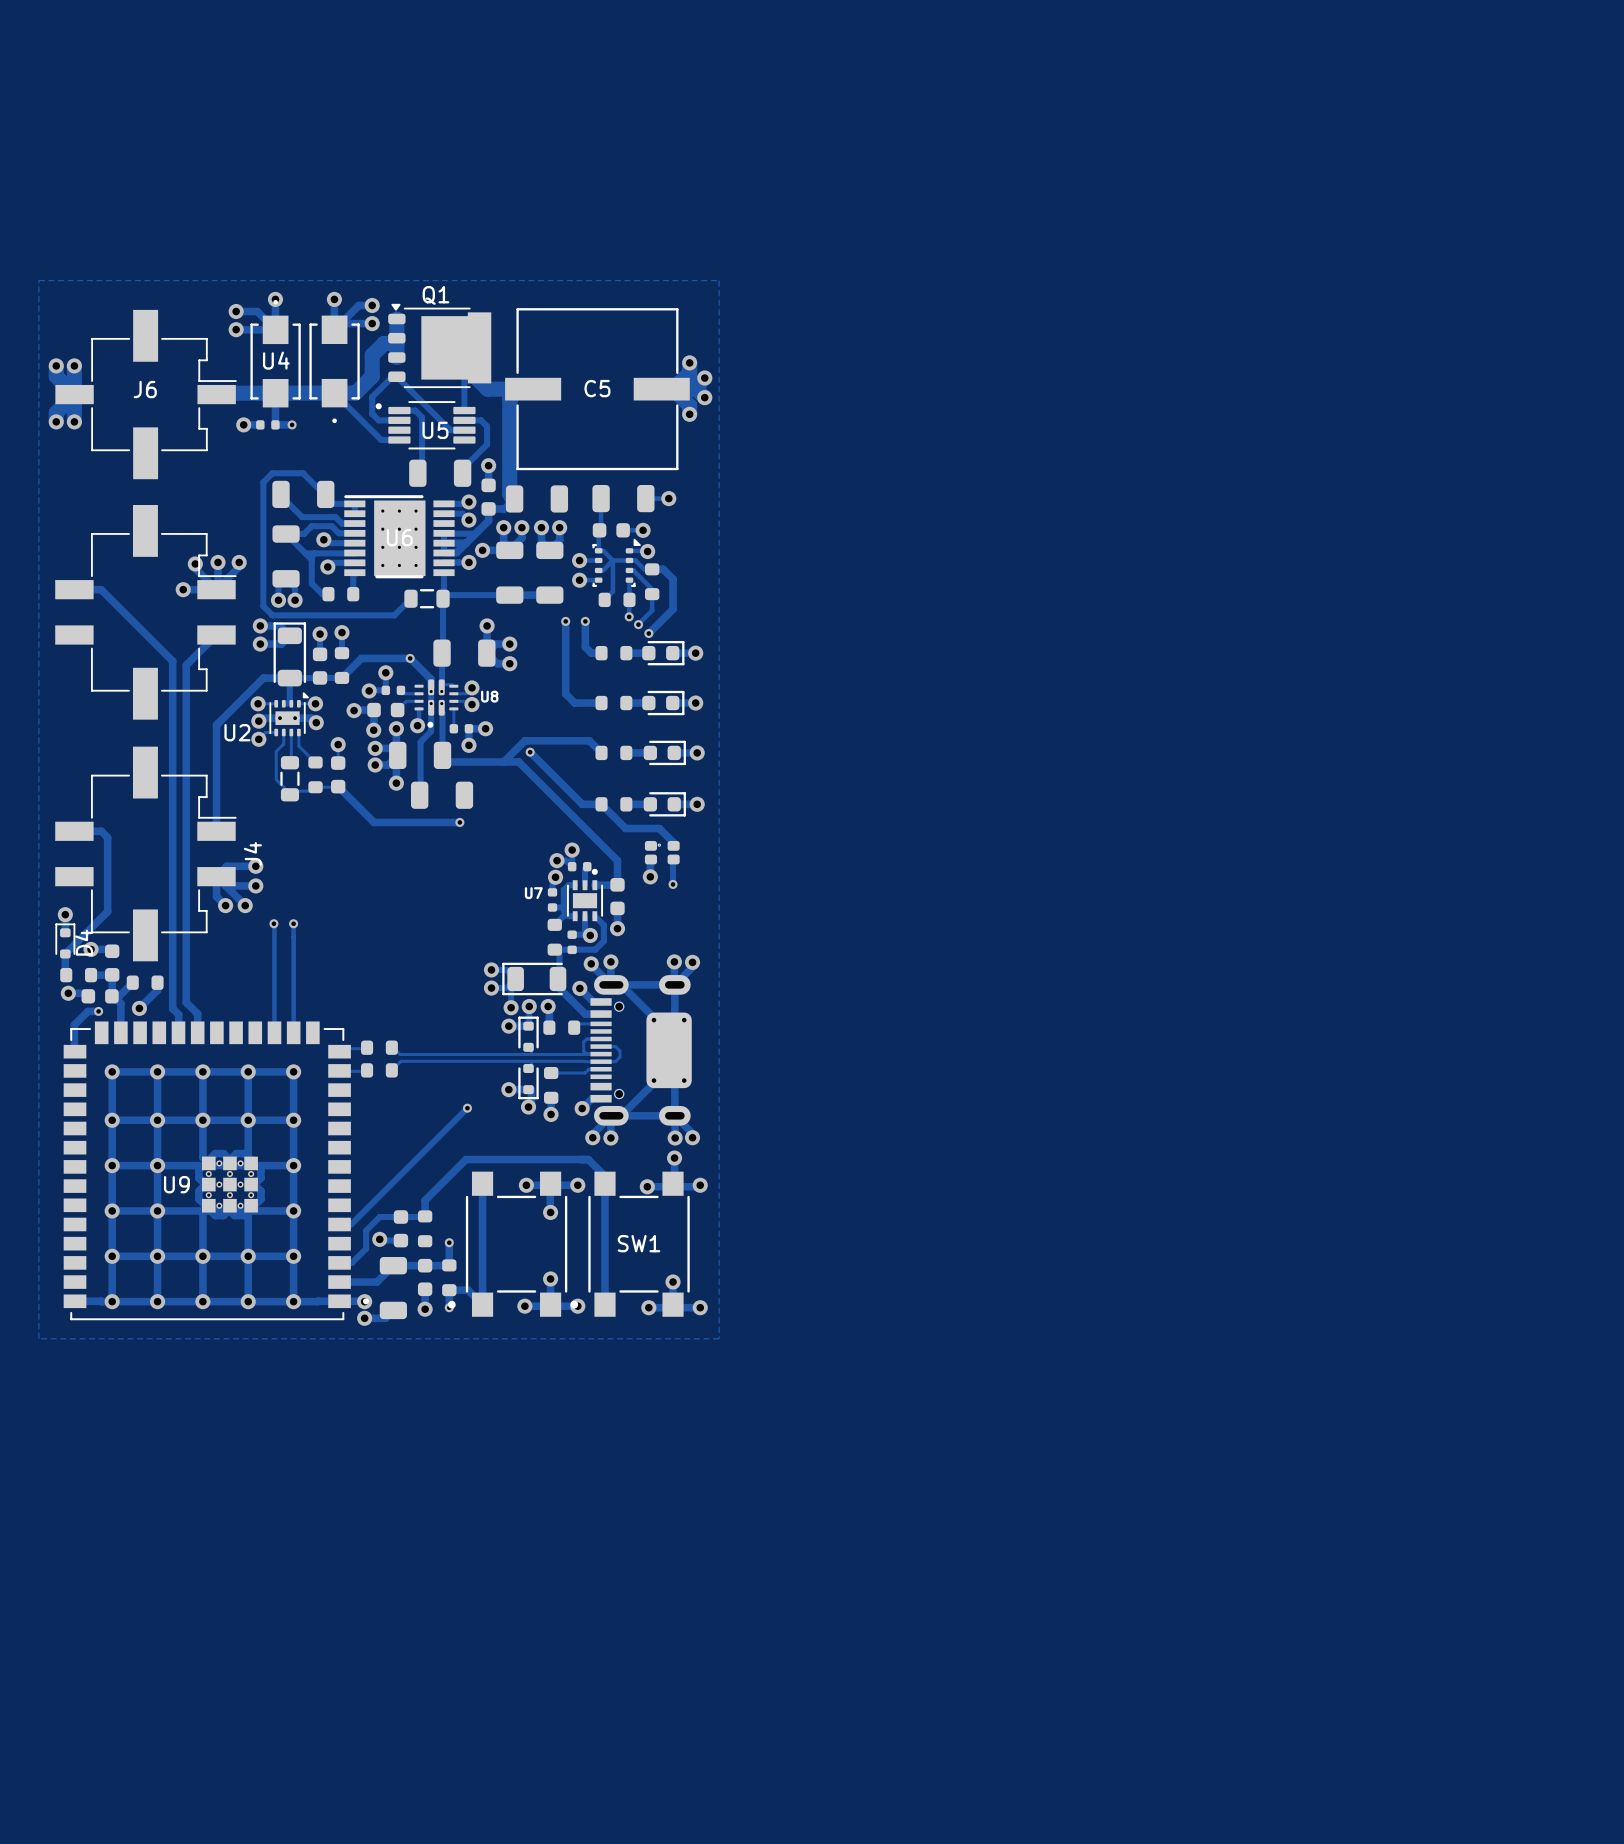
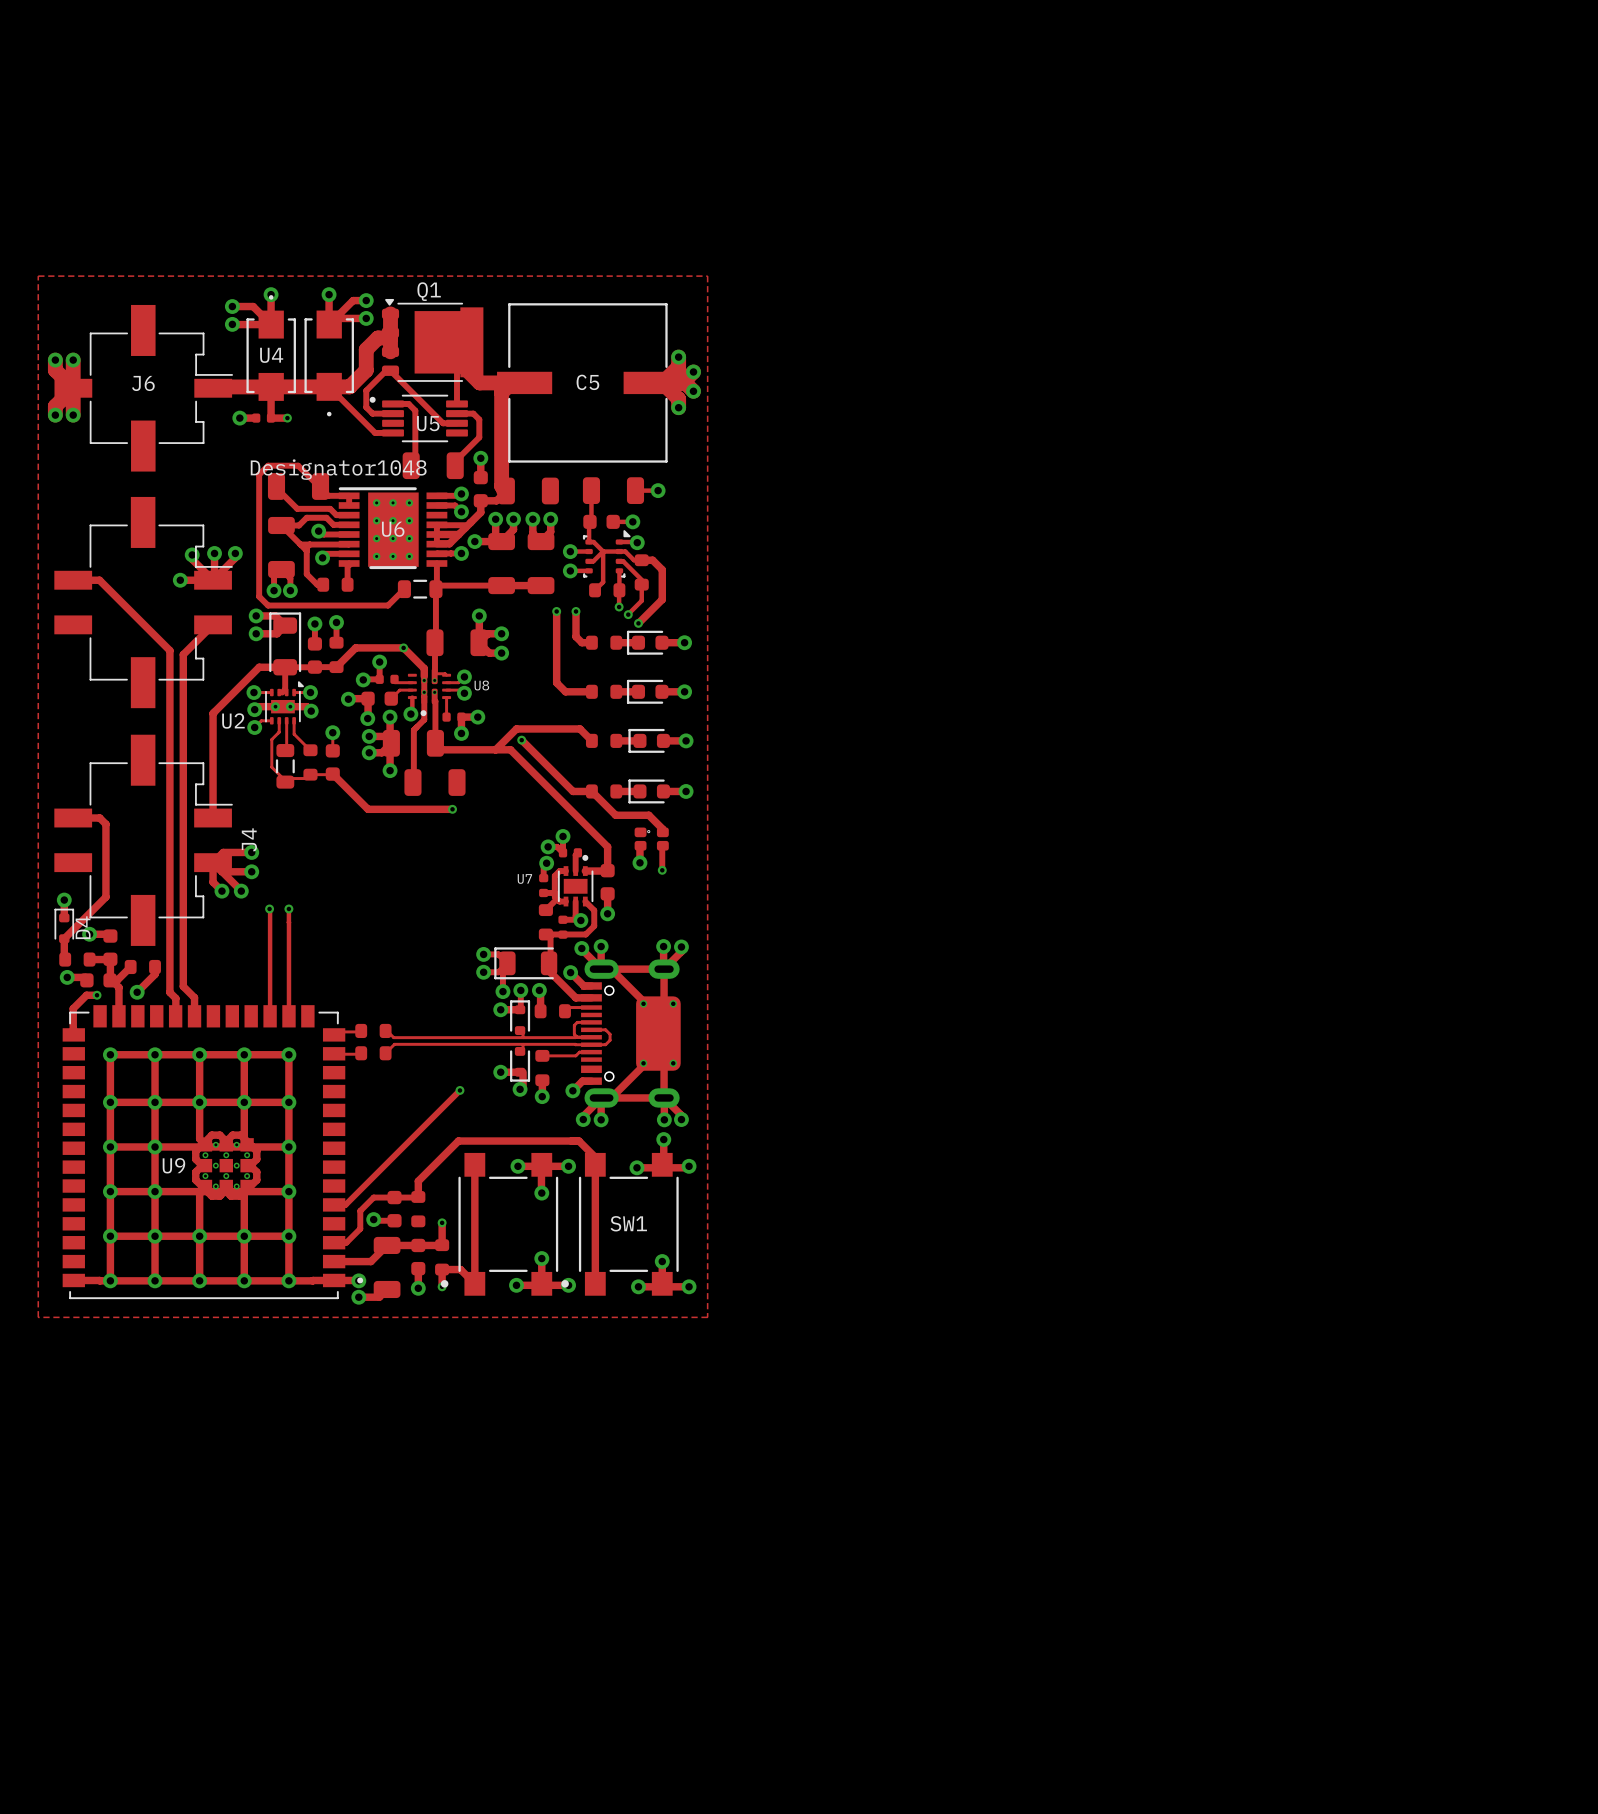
U6 text: none -> Designator1048 (338, 469)
part rotation: 0° (663, 653) -> 180° (647, 642)
part rotation: 0° (663, 703) -> 180° (647, 691)
part rotation: 0° (664, 752) -> 180° (649, 740)
part rotation: 0° (664, 804) -> 180° (649, 791)

